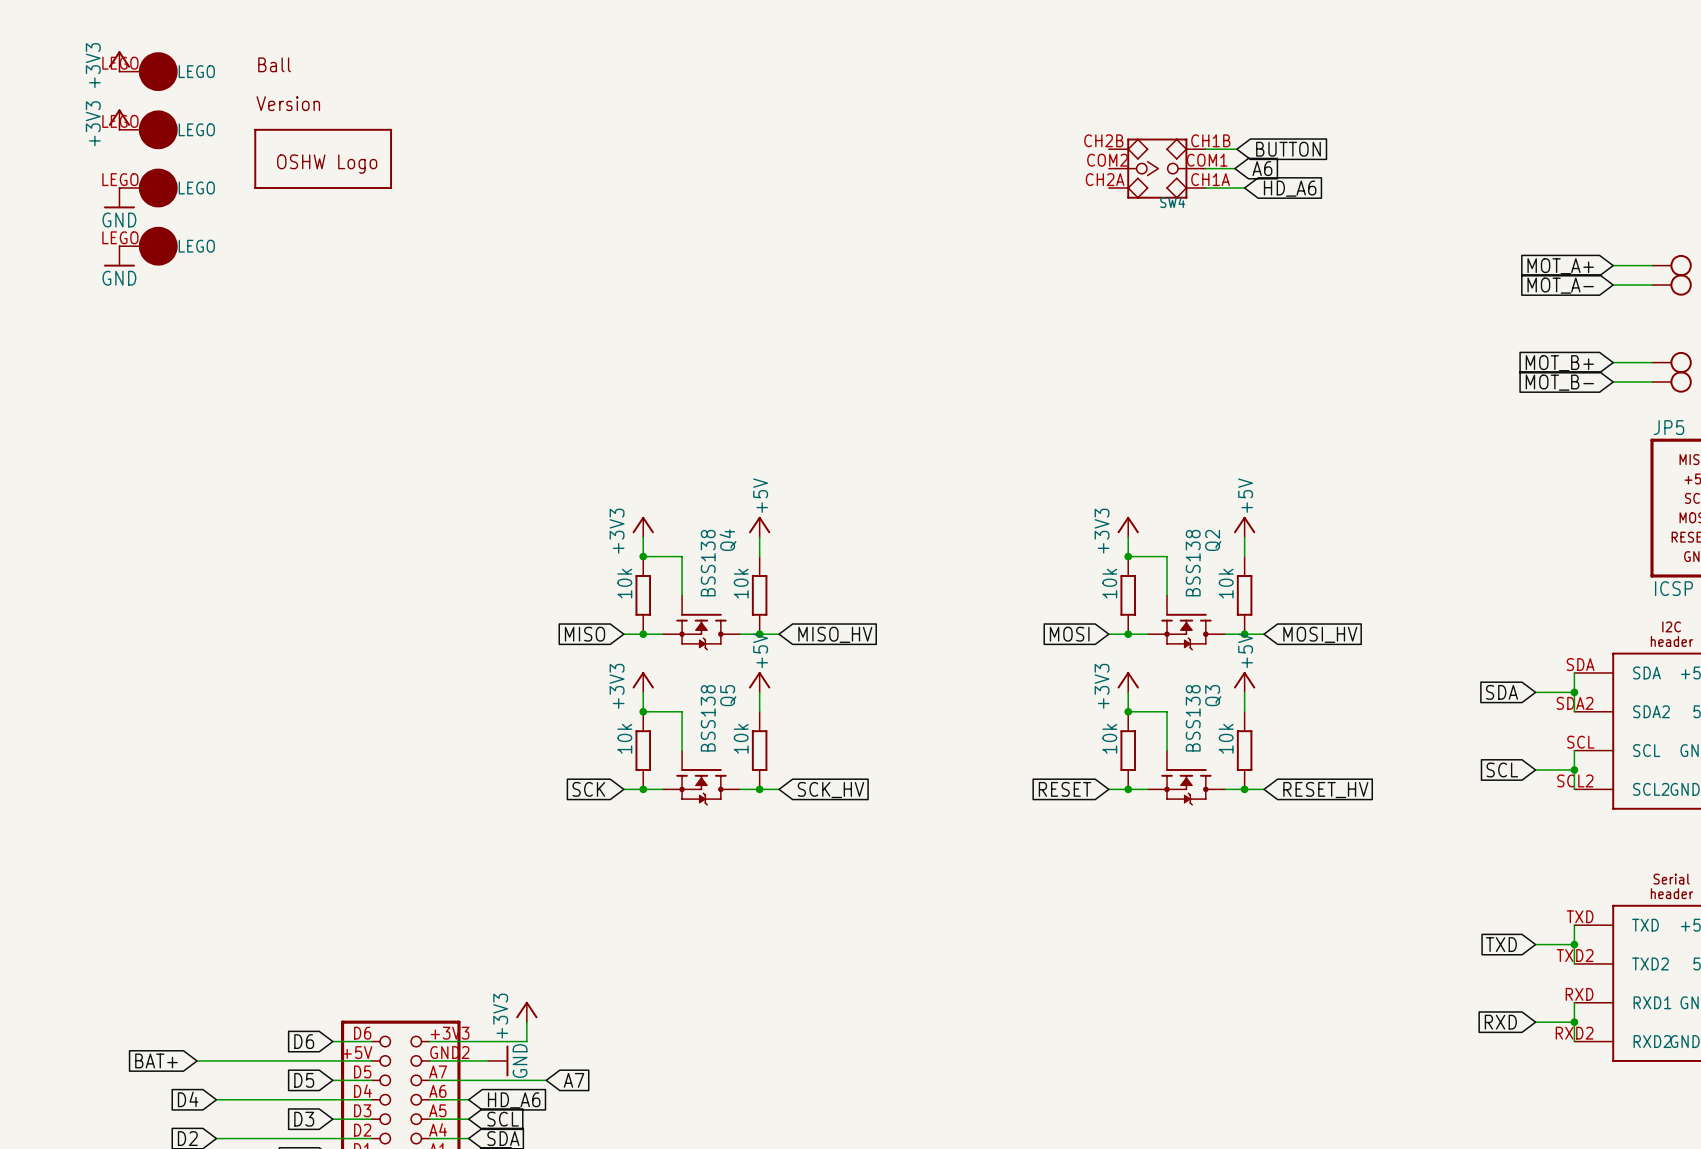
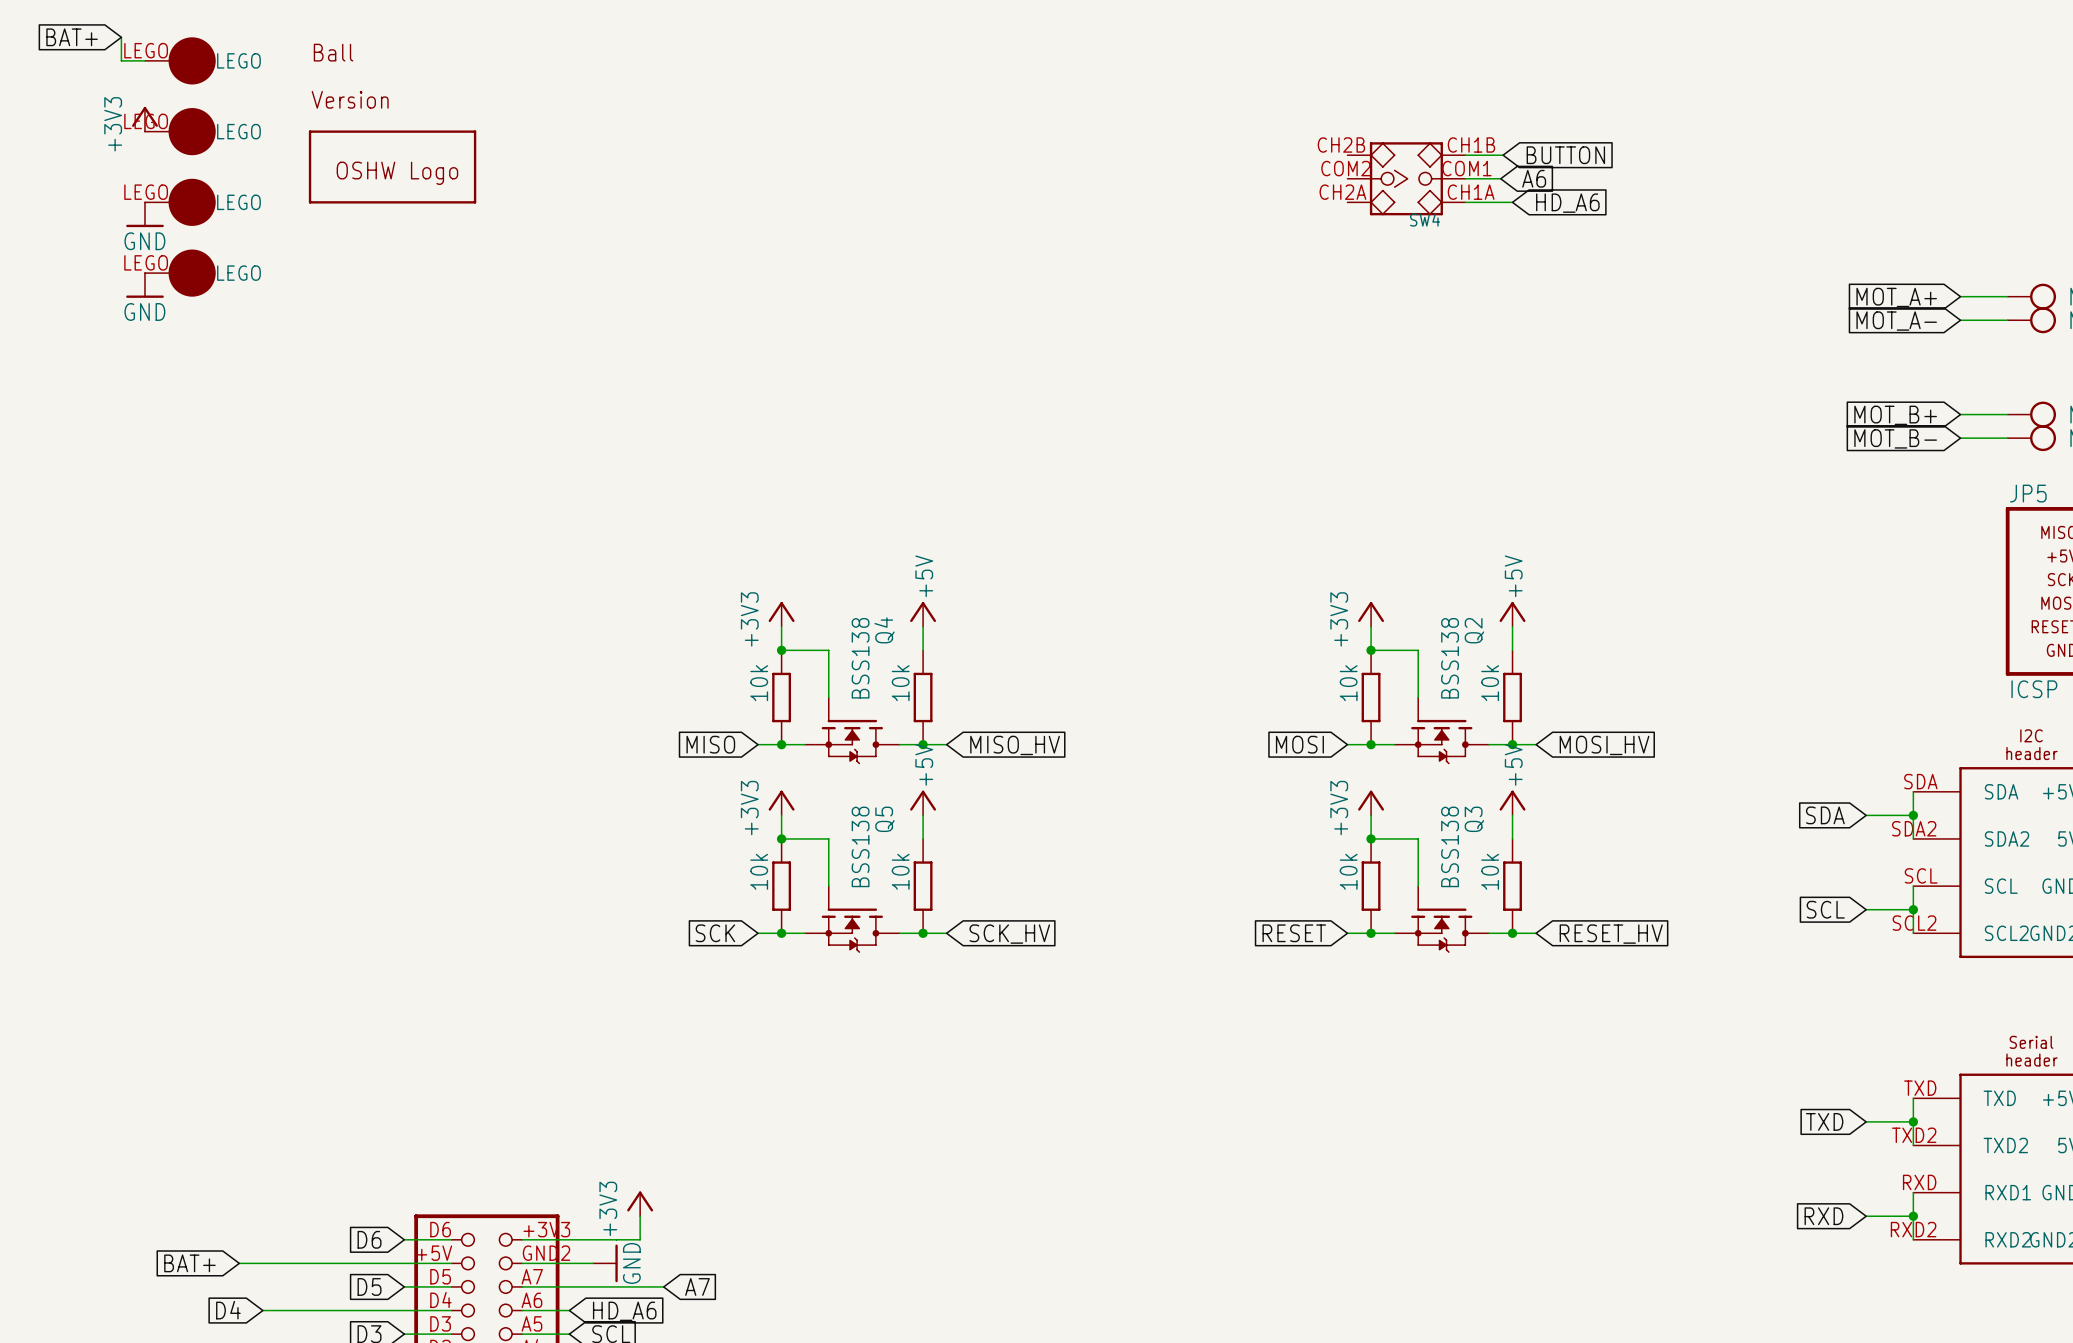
global label: none -> BAT+ (72, 37)
wire: none -> (121, 37) (121, 60) (144, 60)
power symbol: +3V3 (119, 61) -> none

